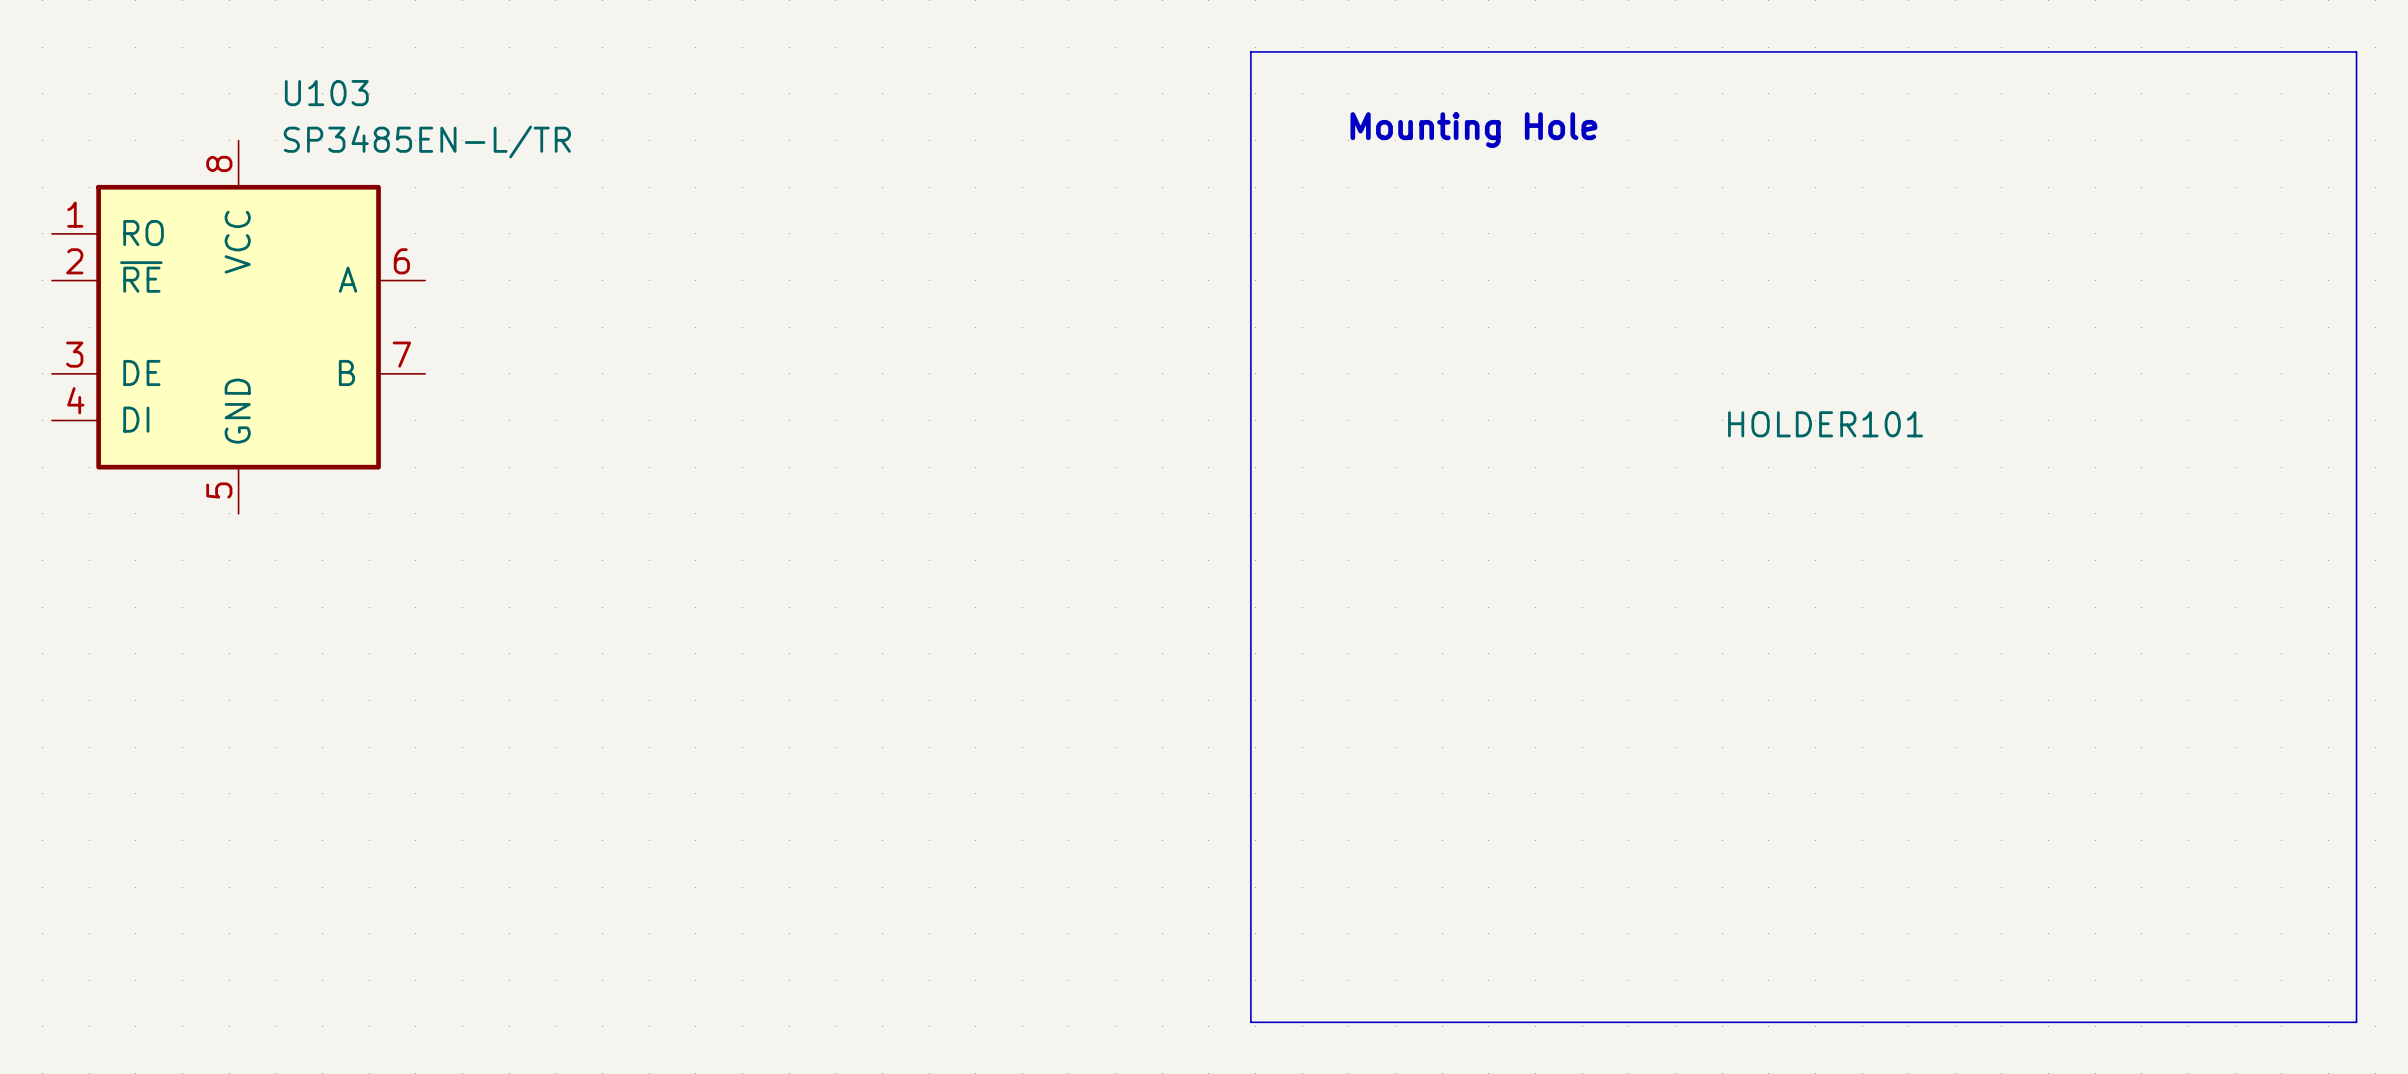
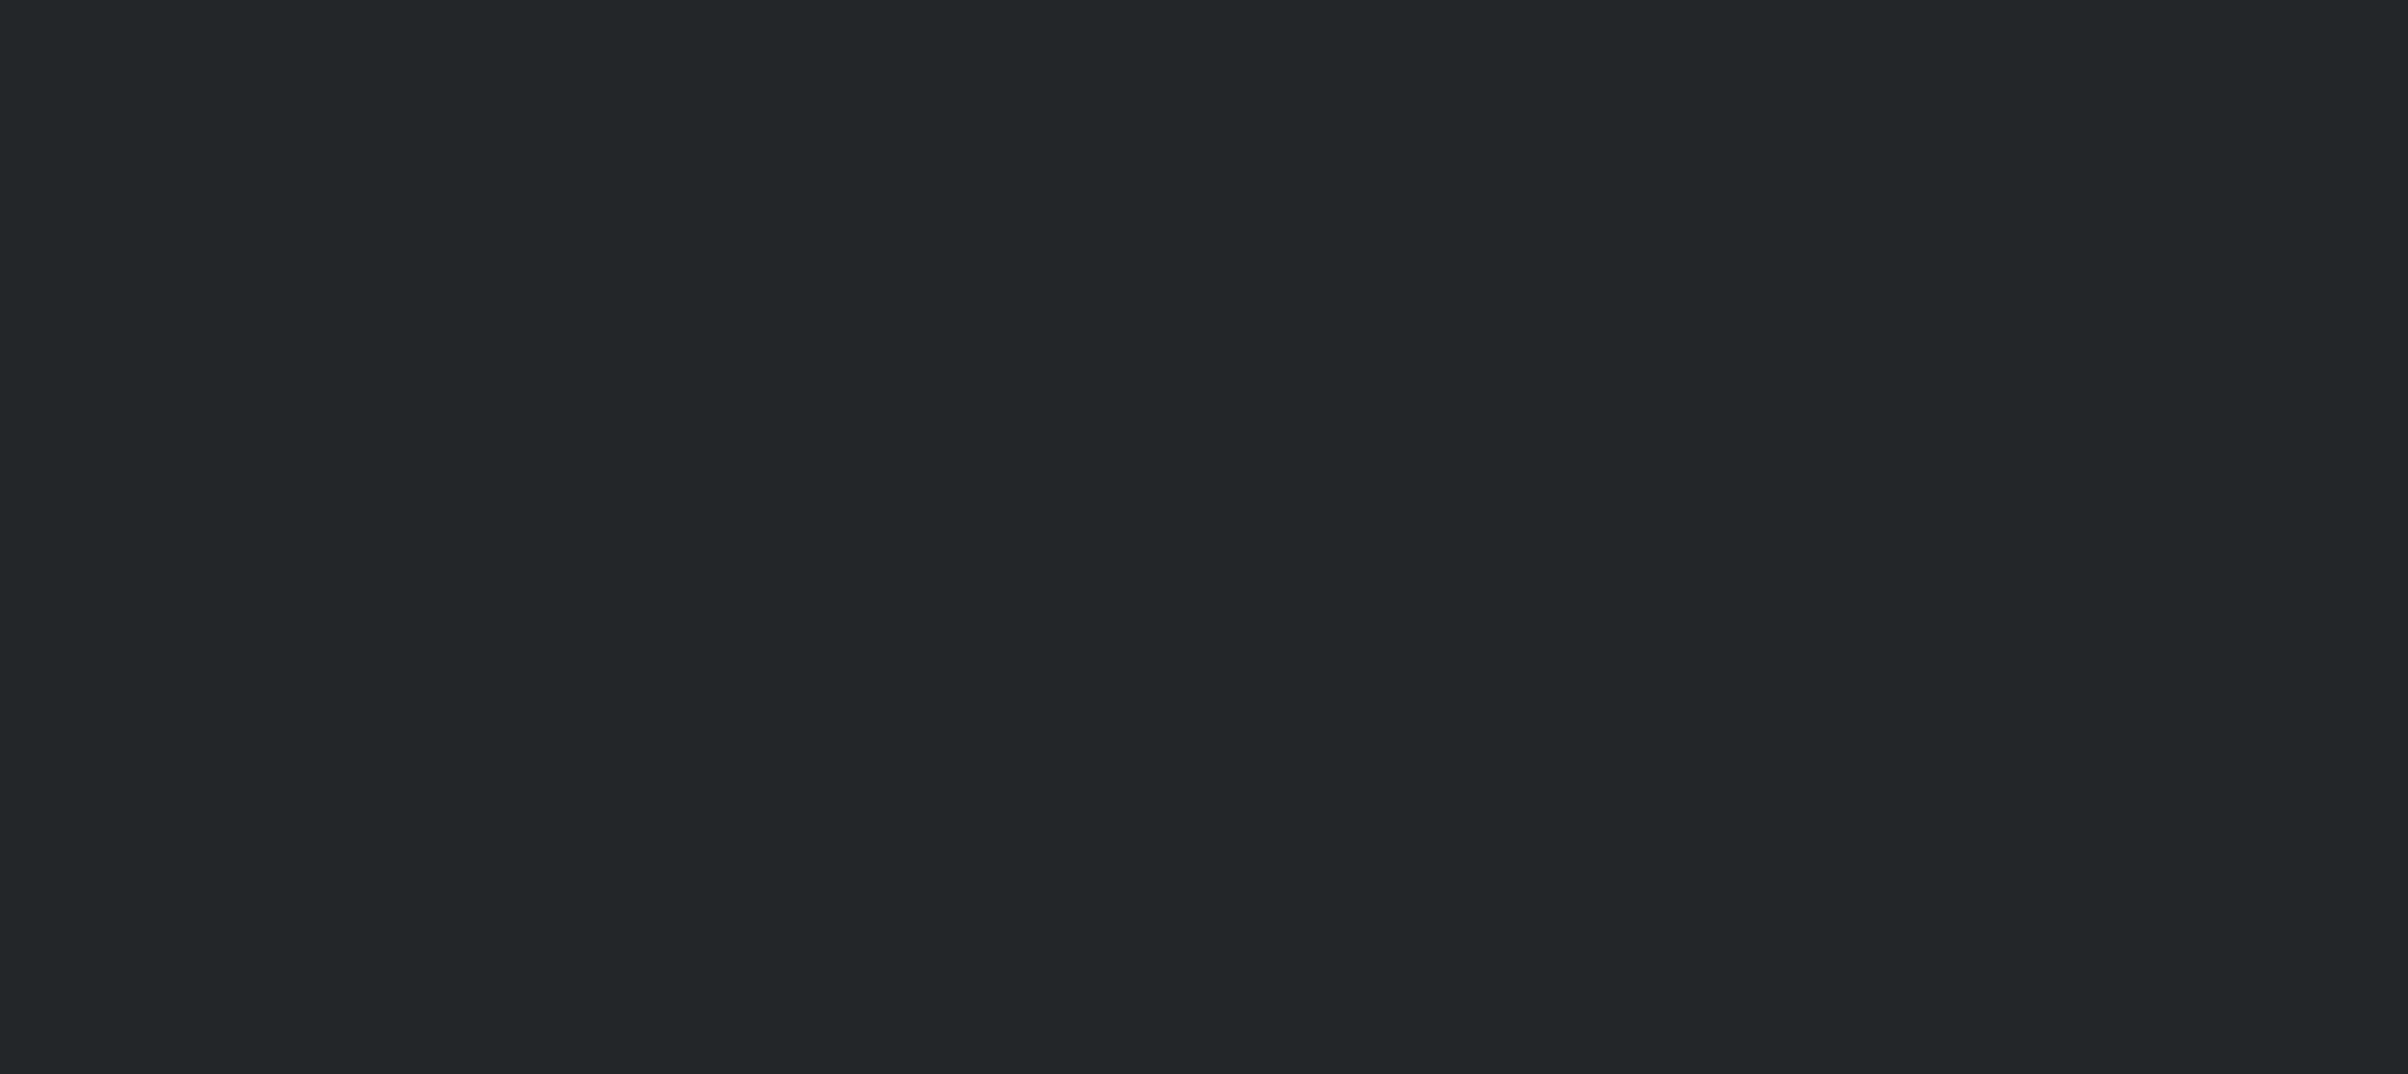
line: (1250, 51) (2356, 51) (2356, 1022) (1250, 1022) (1250, 51) -> none
text: Mounting Hole (1473, 130) -> none
U103: SP3485EN-L/TR (238, 327) -> none
HOLDER101: (1825, 424) -> none

